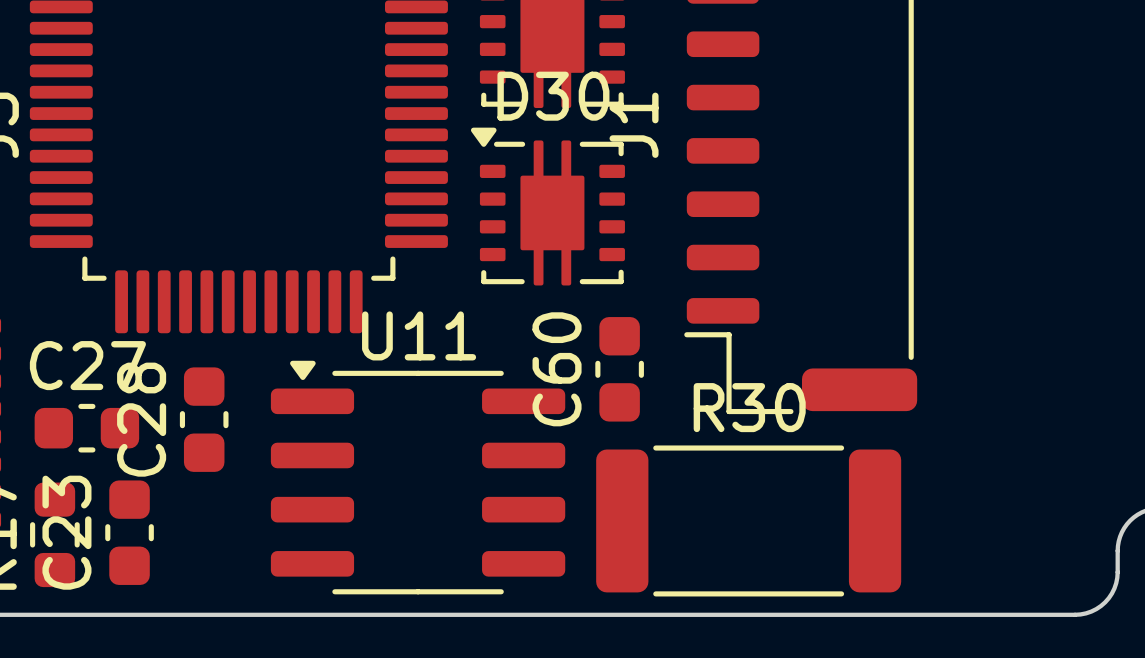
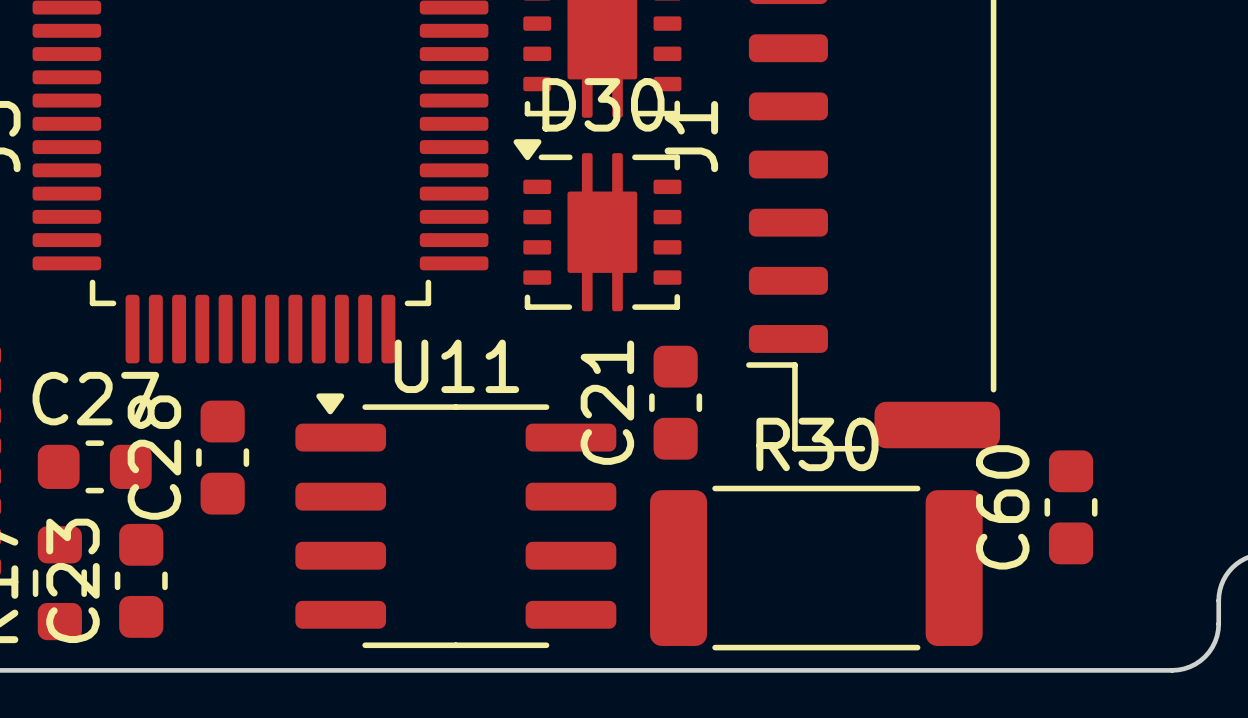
C60 name: C60 (557, 369) -> C21 (607, 402)
C60: none -> (1071, 507)

